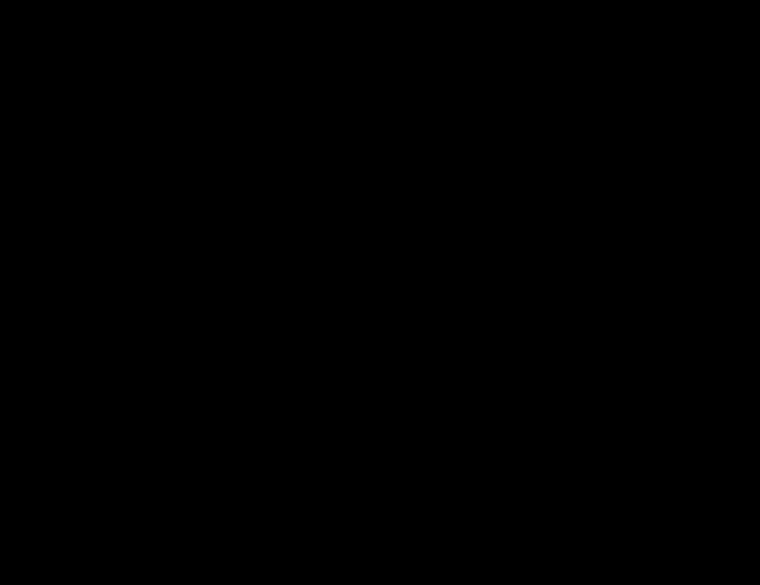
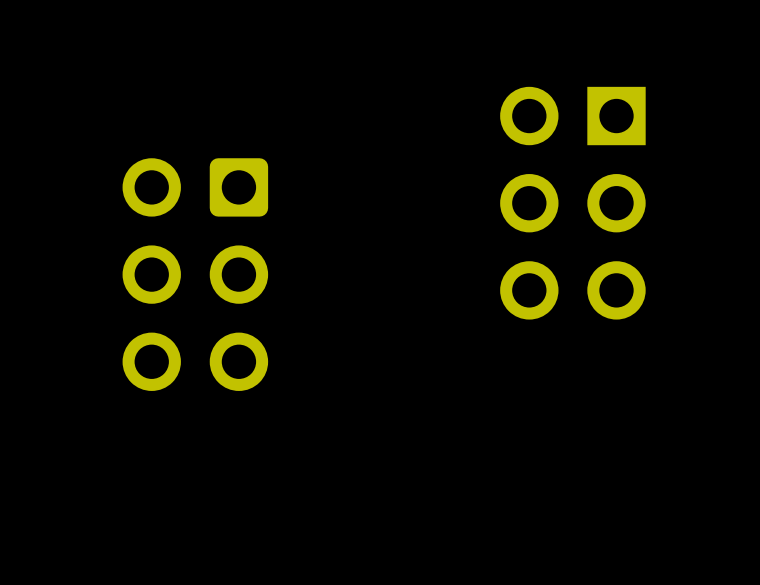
part: none -> (572, 203)
part: none -> (195, 274)

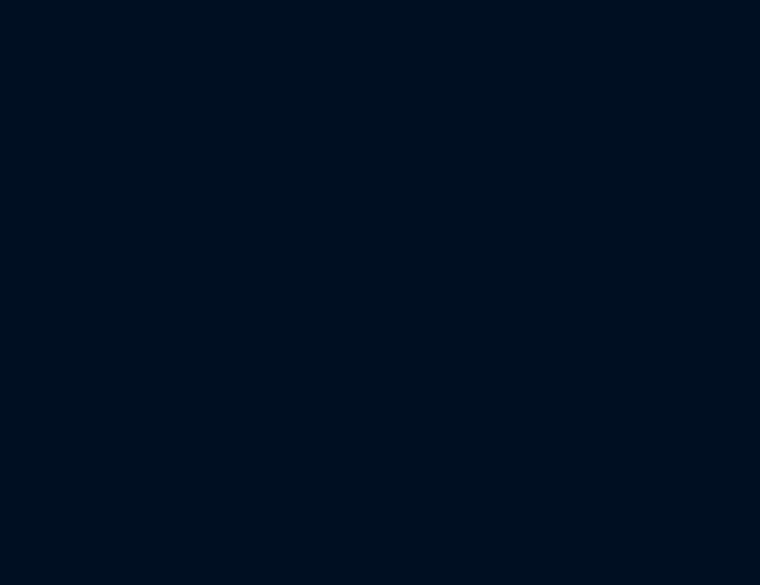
part: (572, 203) -> none
part: (195, 274) -> none

